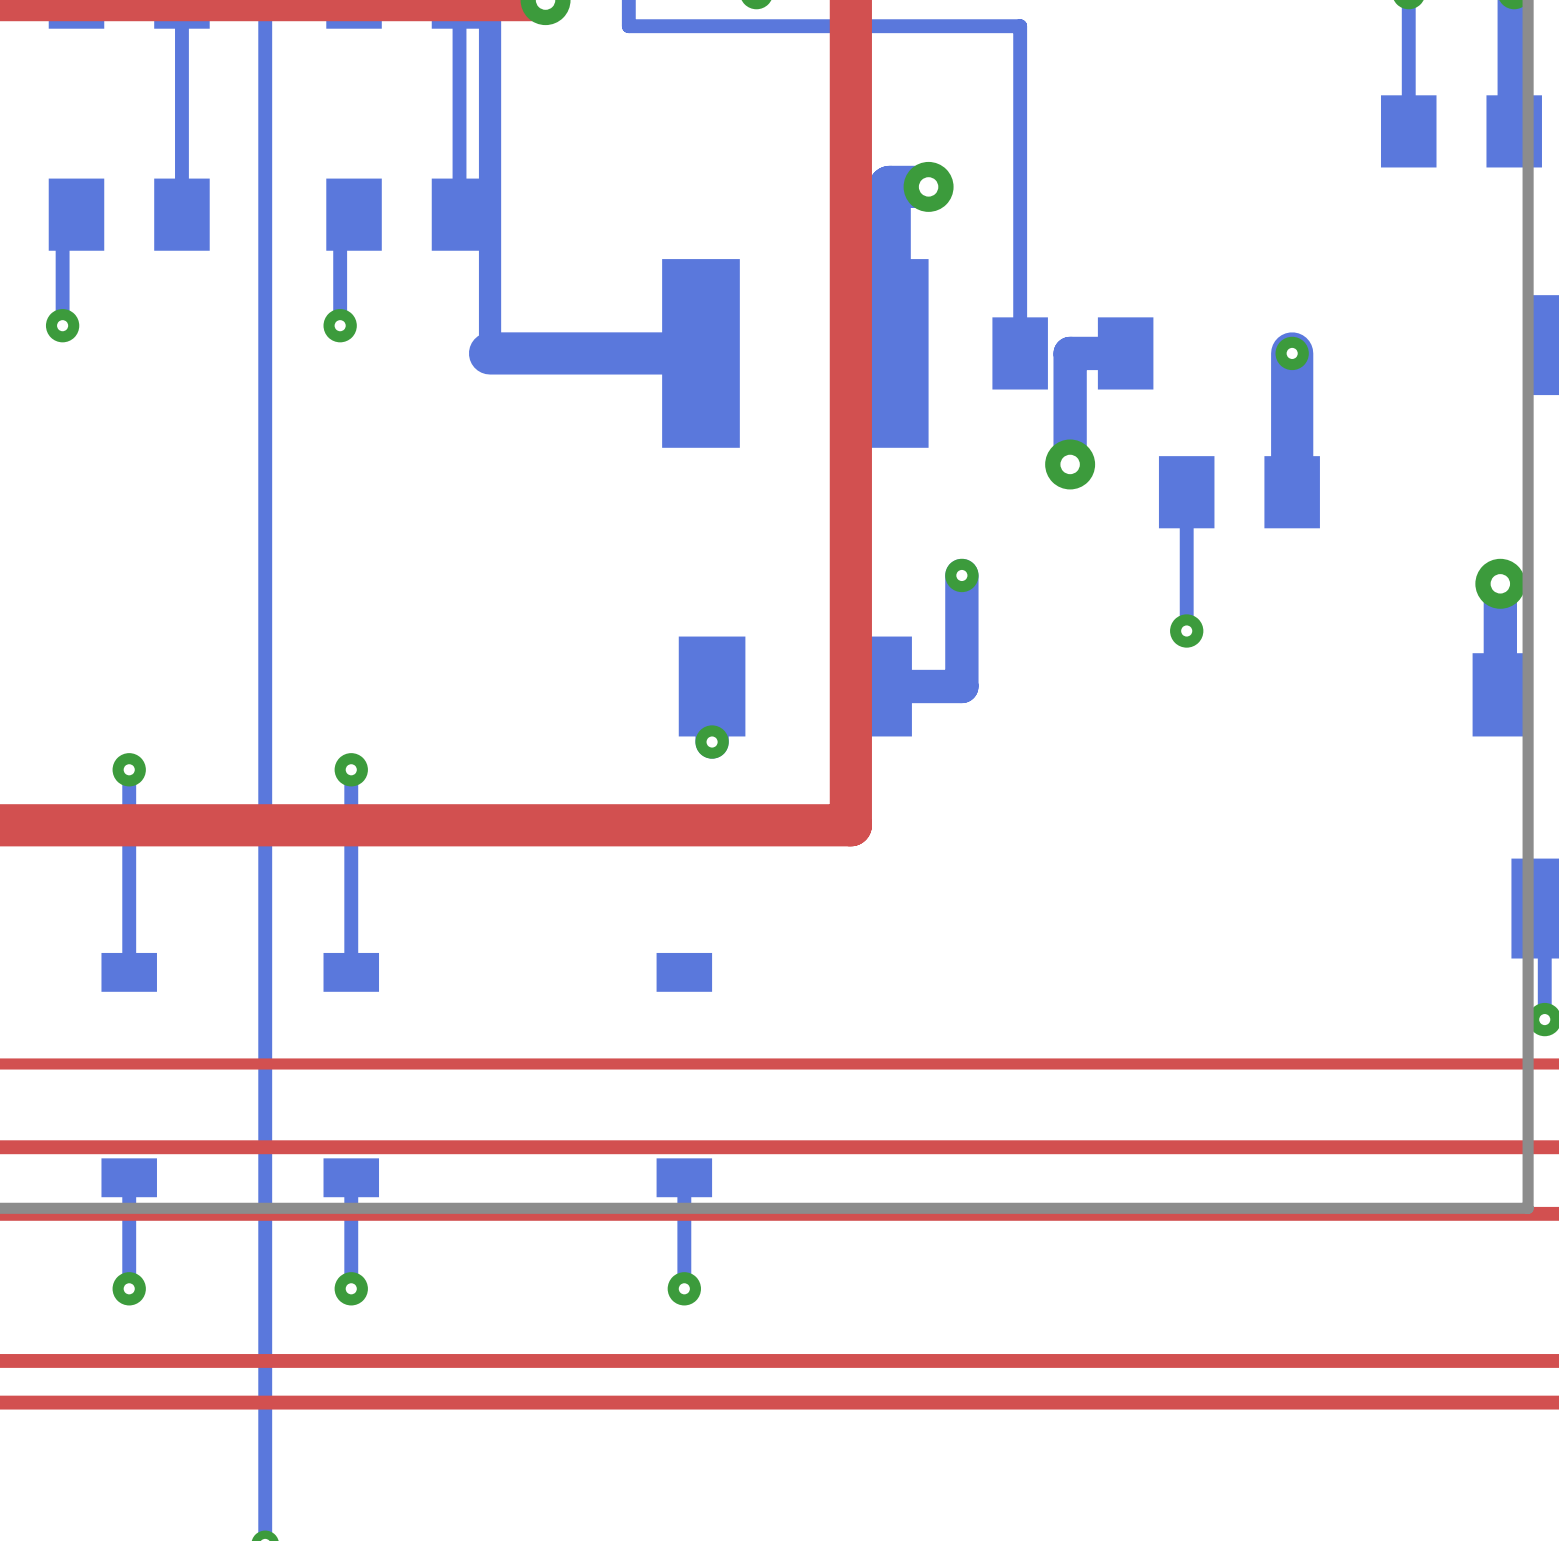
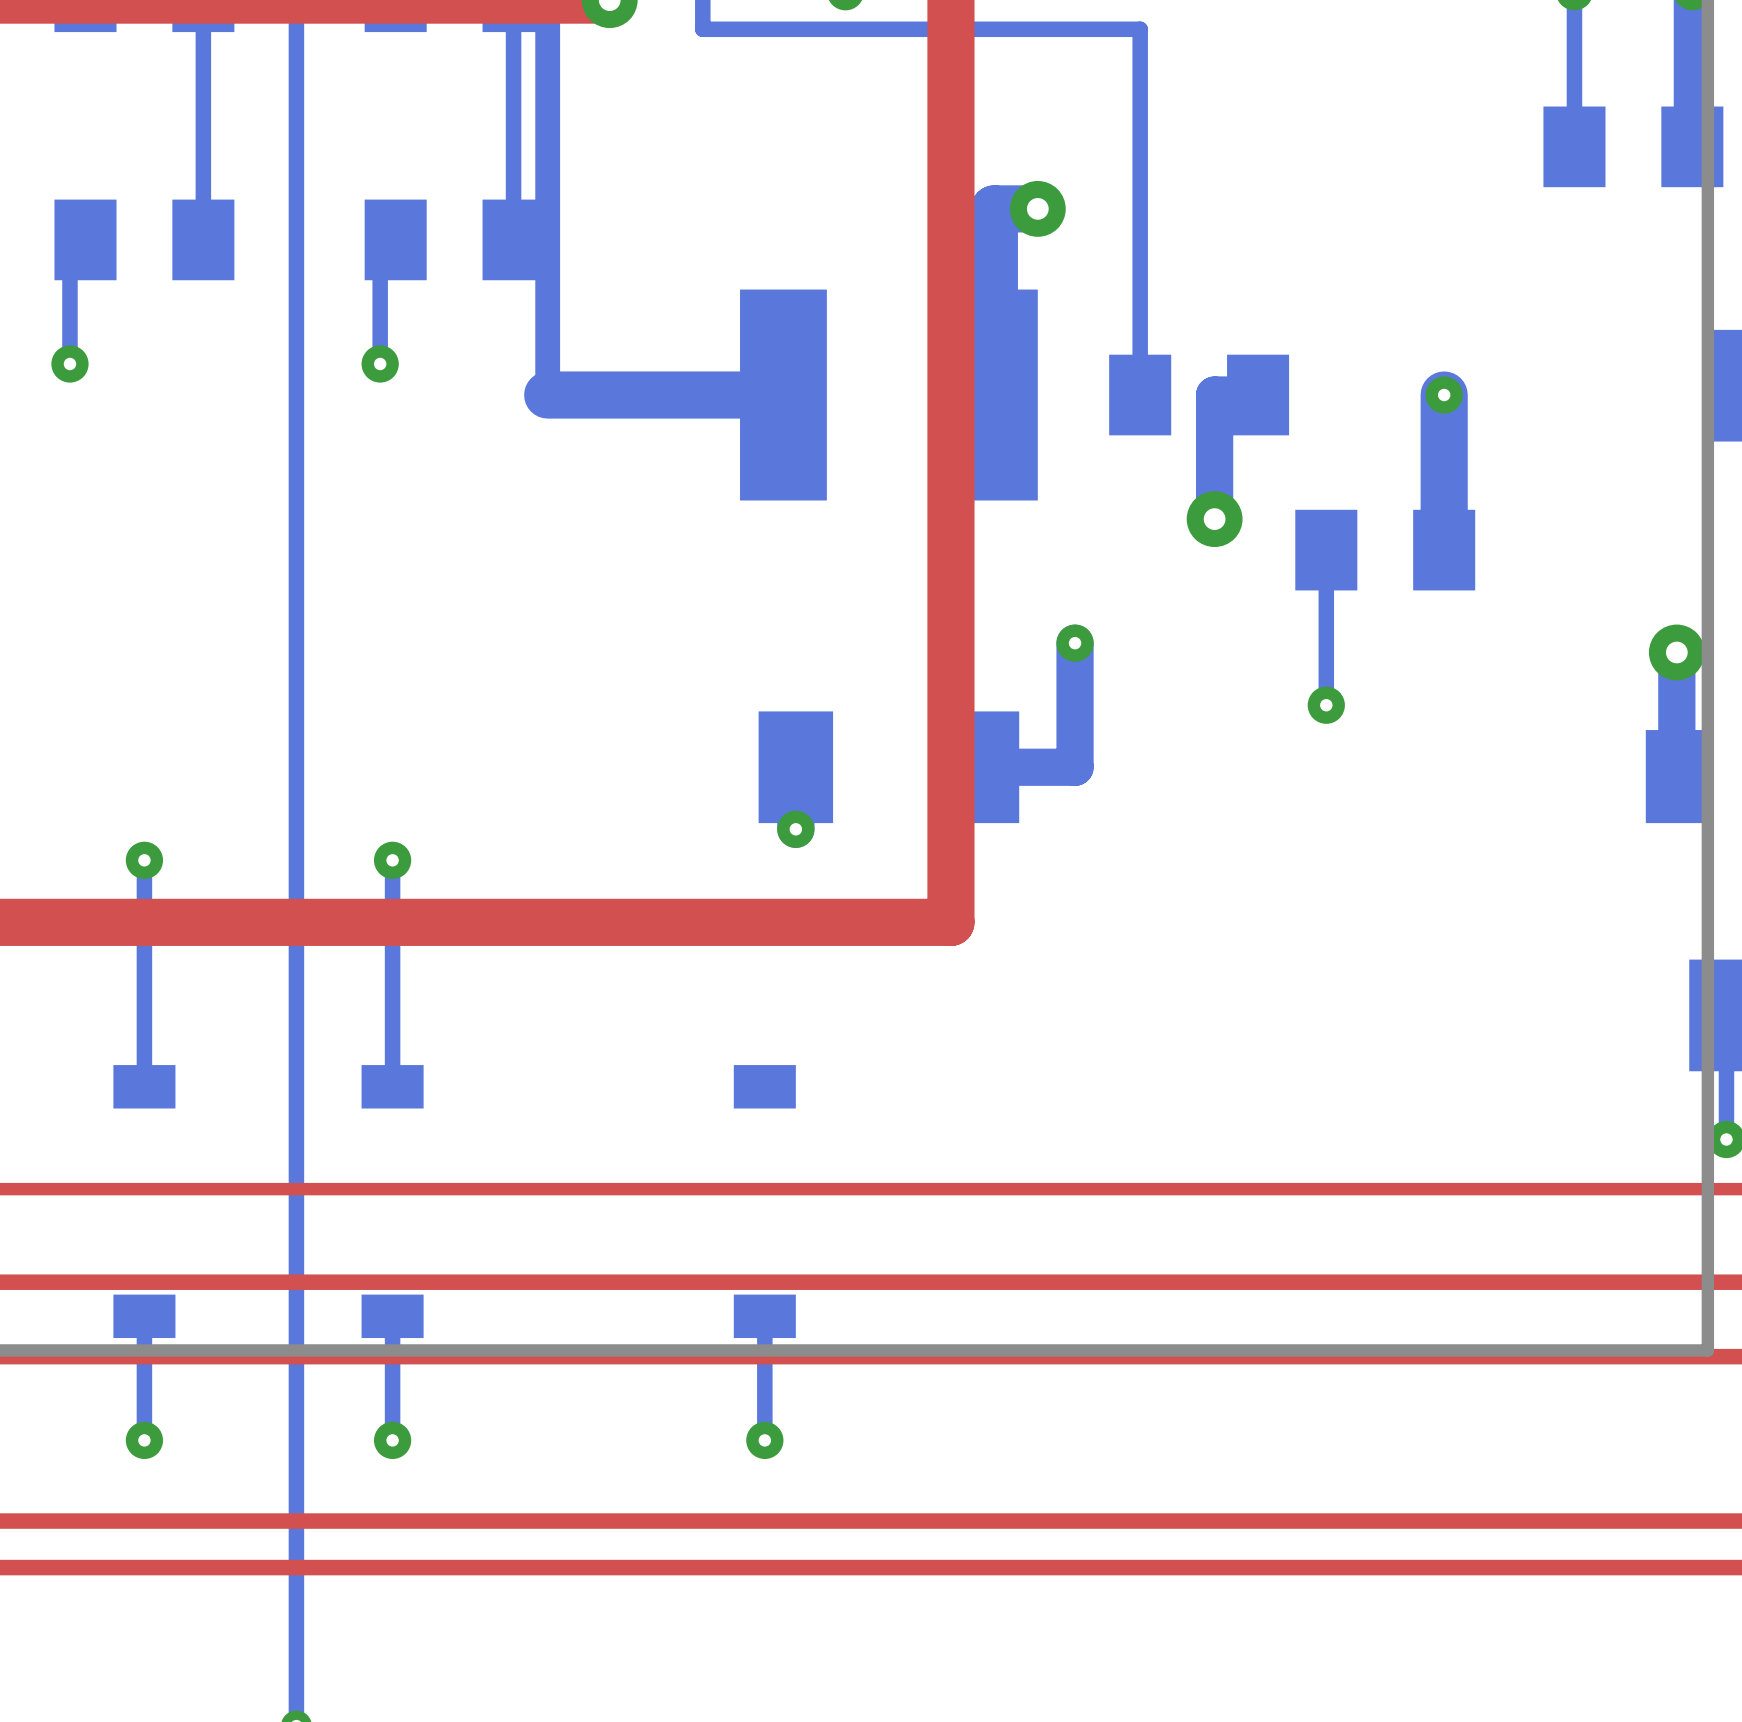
bottom track: (1086, 353) (1070, 353) (1070, 464) -> (1214, 395) (1214, 519)
via position: (1070, 464) -> (1214, 519)

